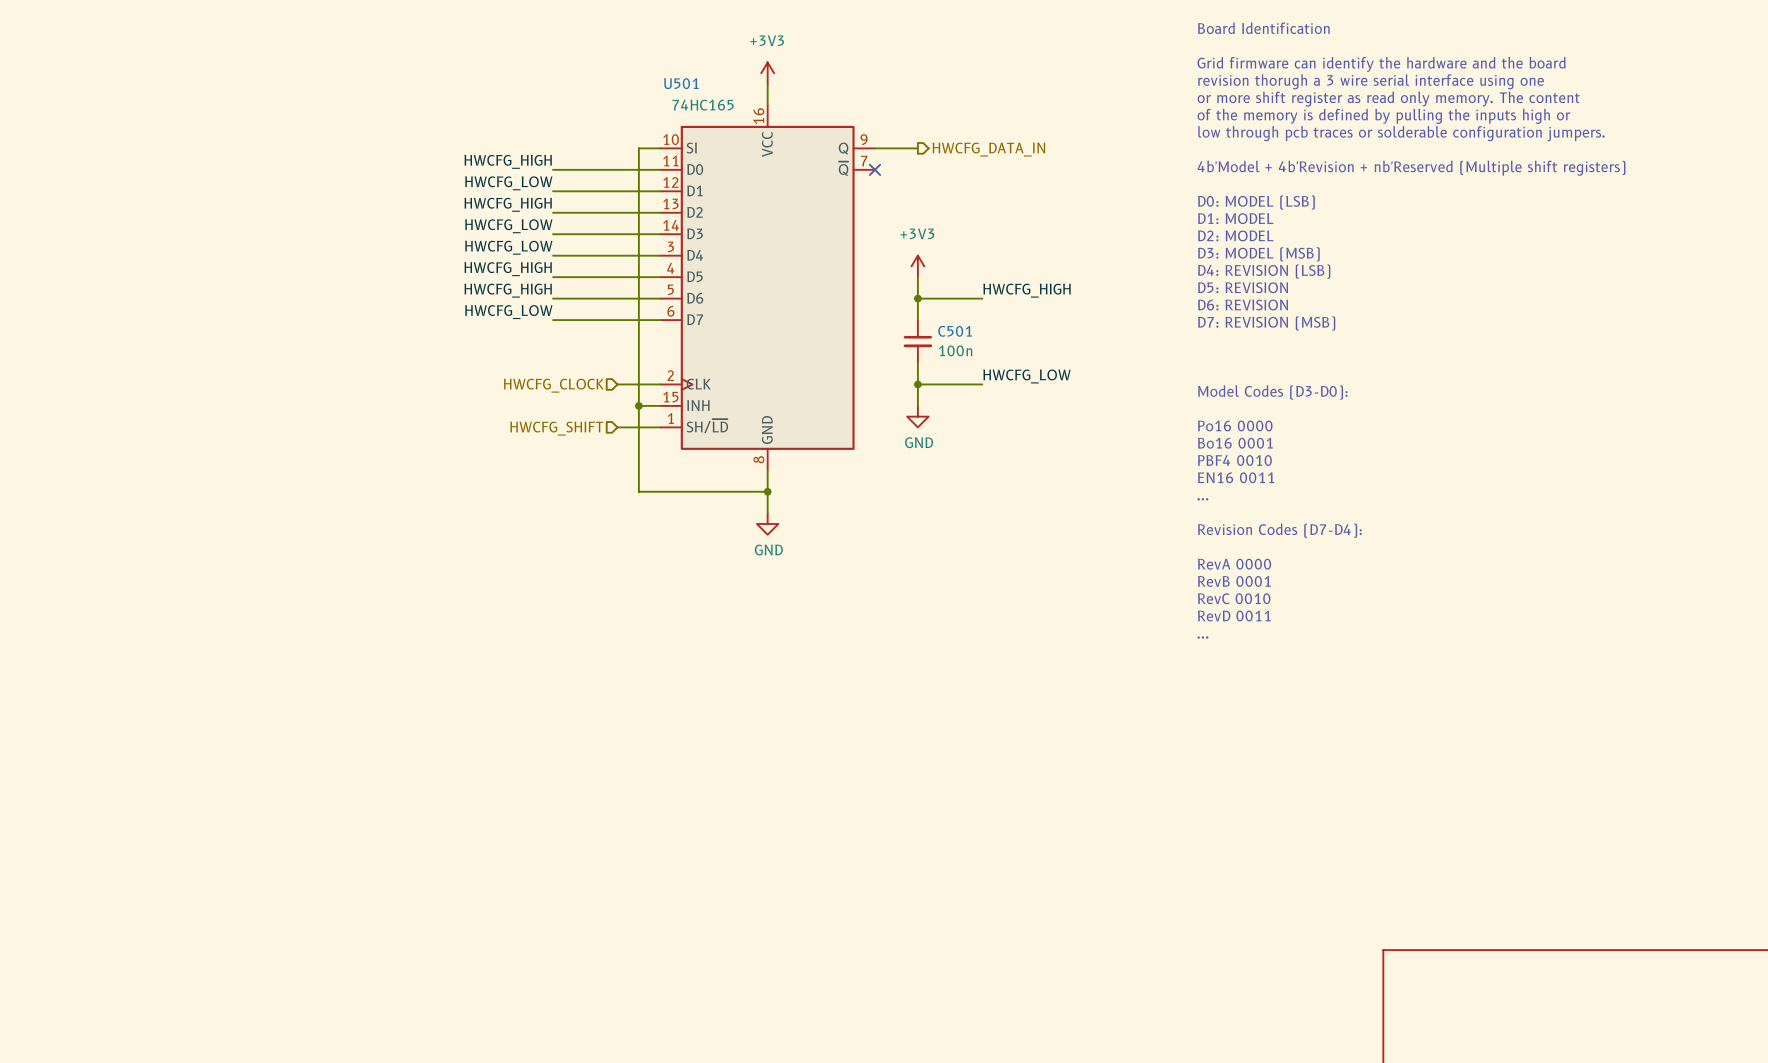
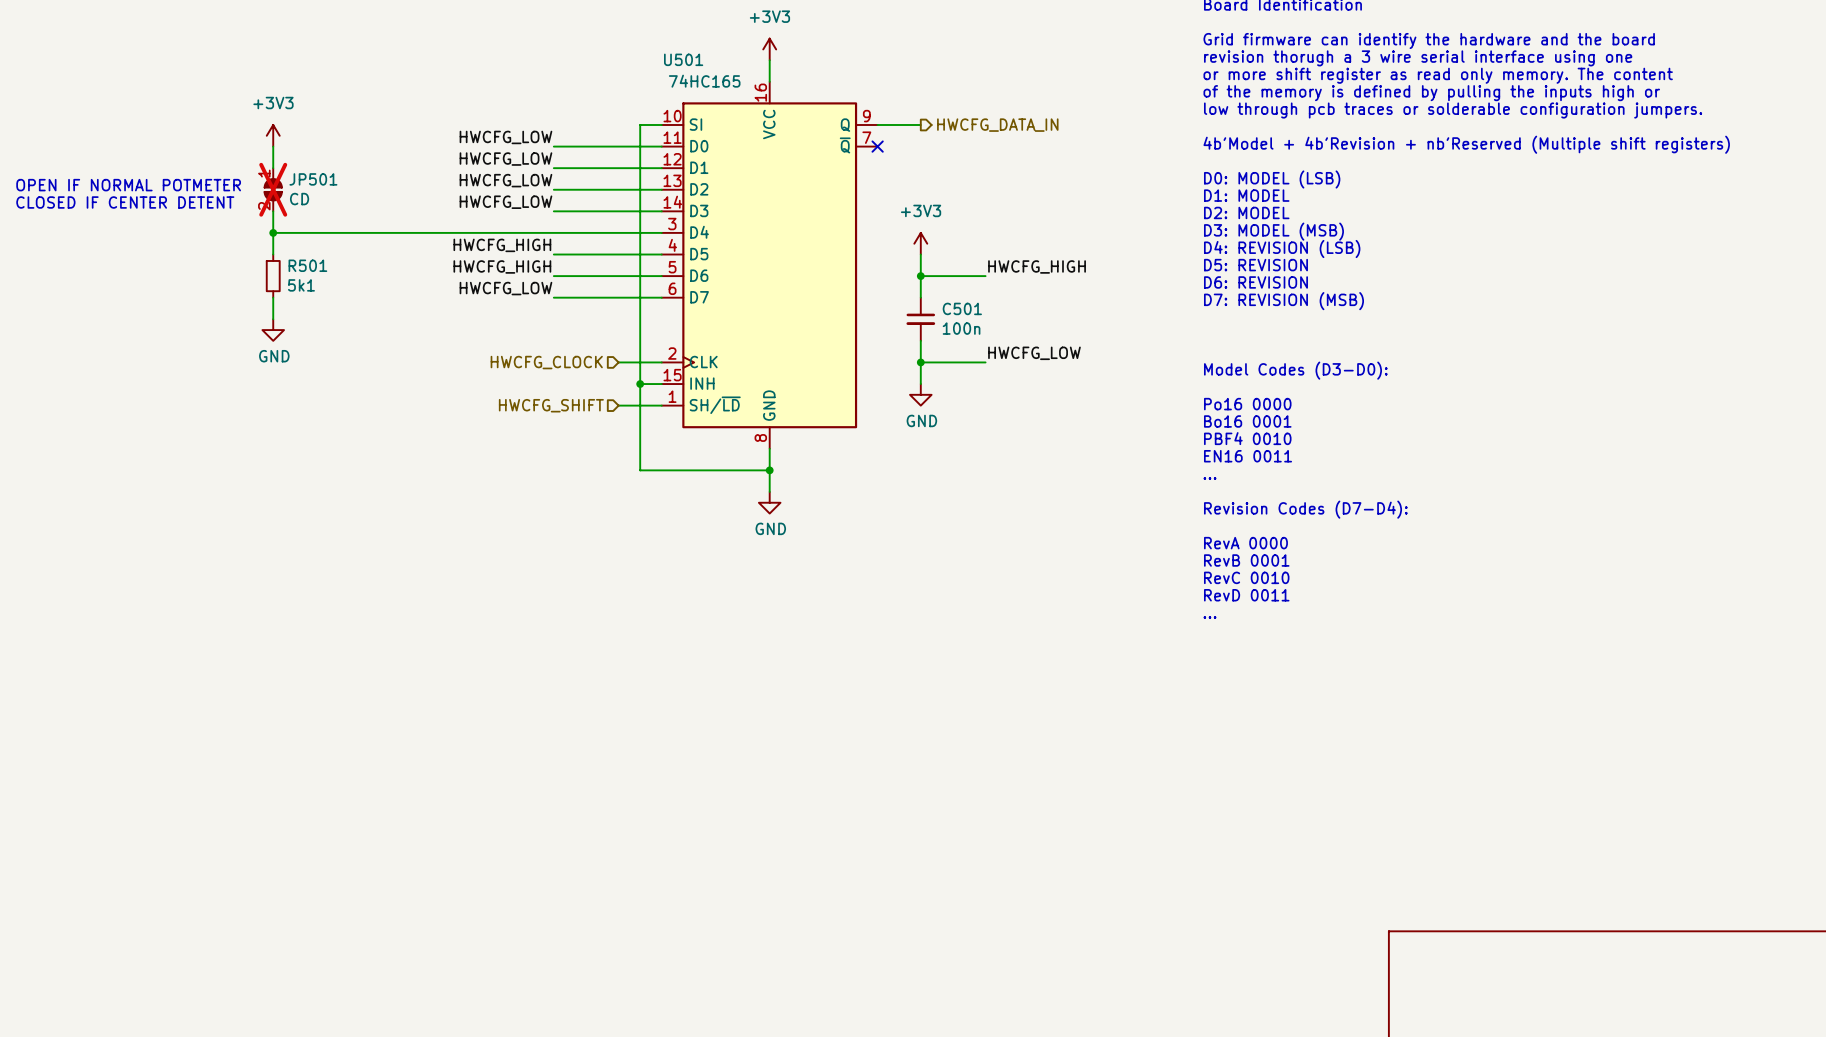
power symbol: none -> +3V3 (273, 135)
label: HWCFG_HIGH (508, 161) -> HWCFG_LOW (505, 137)
wire: none -> (273, 146) (273, 168)
label: HWCFG_HIGH (508, 204) -> HWCFG_LOW (505, 180)
text: none -> OPEN IF NORMAL POTMETER (128, 185)
JP501: none -> CD (273, 189)
text: none -> CLOSED IF CENTER DETENT (125, 202)
wire: none -> (273, 211) (273, 254)
label: HWCFG_LOW (508, 247) -> none
wire: none -> (273, 232) (553, 232)
junction: none -> (273, 232)
R501: none -> 5k1 (273, 276)
wire: none -> (273, 297) (273, 319)
power symbol: none -> GND (273, 330)

